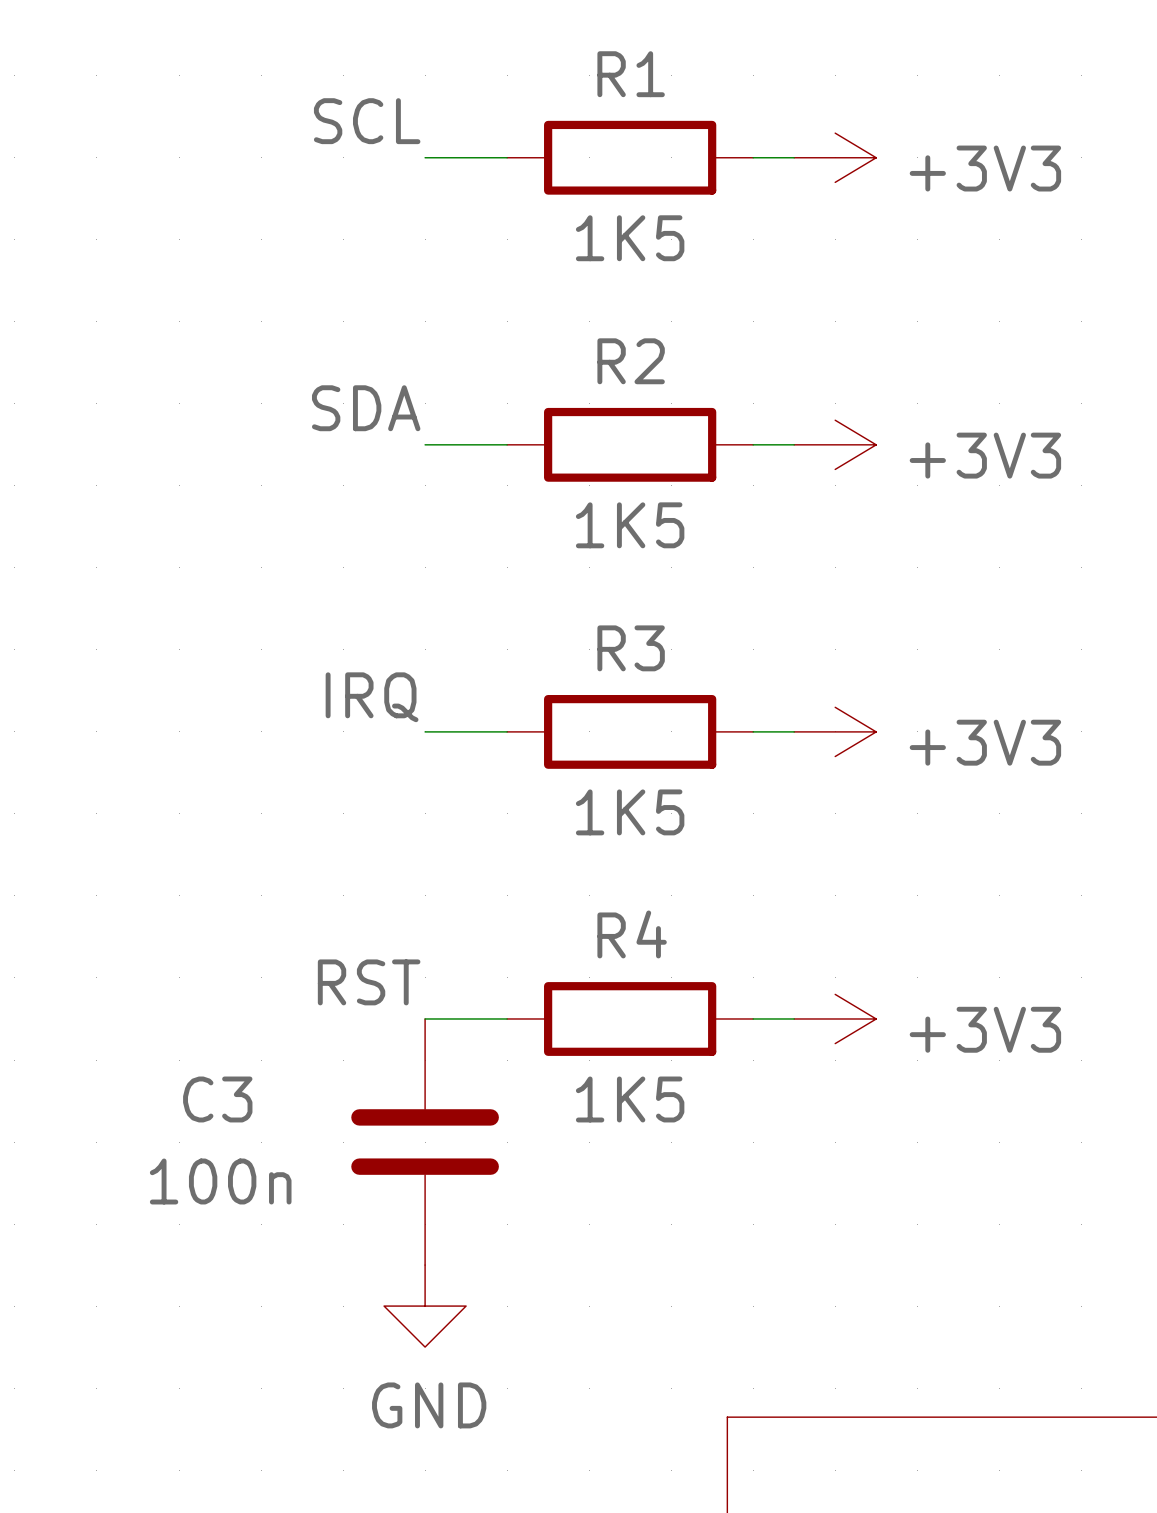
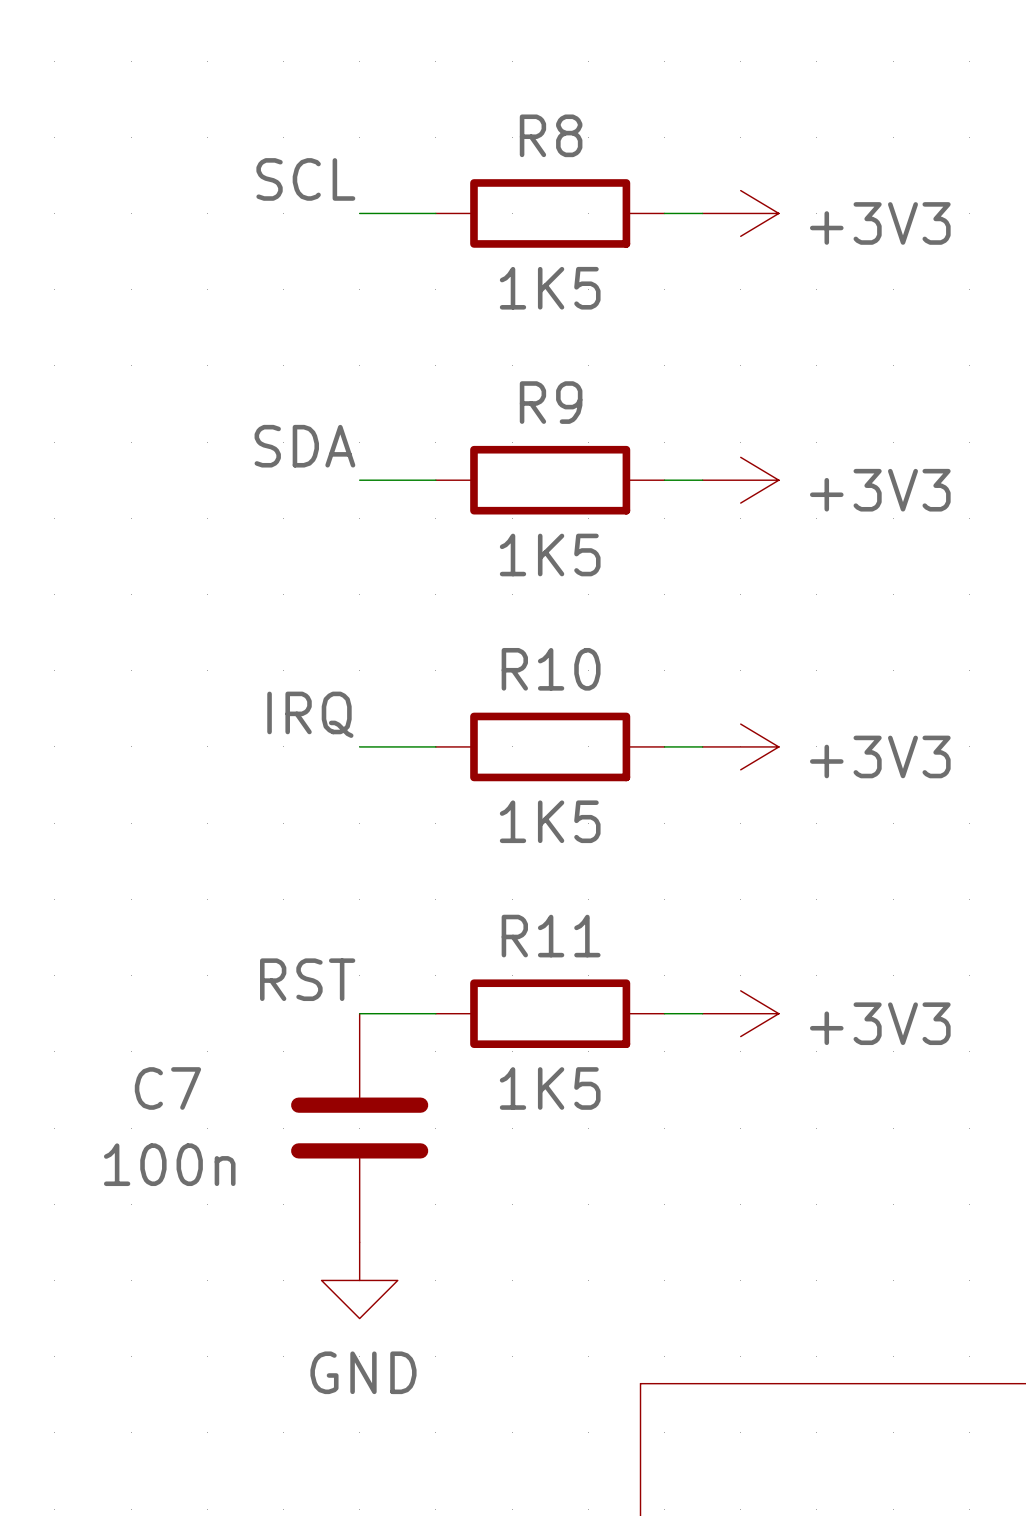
R1 name: R1 (631, 74) -> R8 (551, 135)
R2 name: R2 (631, 361) -> R9 (551, 402)
R3 name: R3 (631, 648) -> R10 (551, 669)
R4 name: R4 (632, 934) -> R11 (551, 936)
C3 name: C3 (217, 1099) -> C7 (167, 1088)

